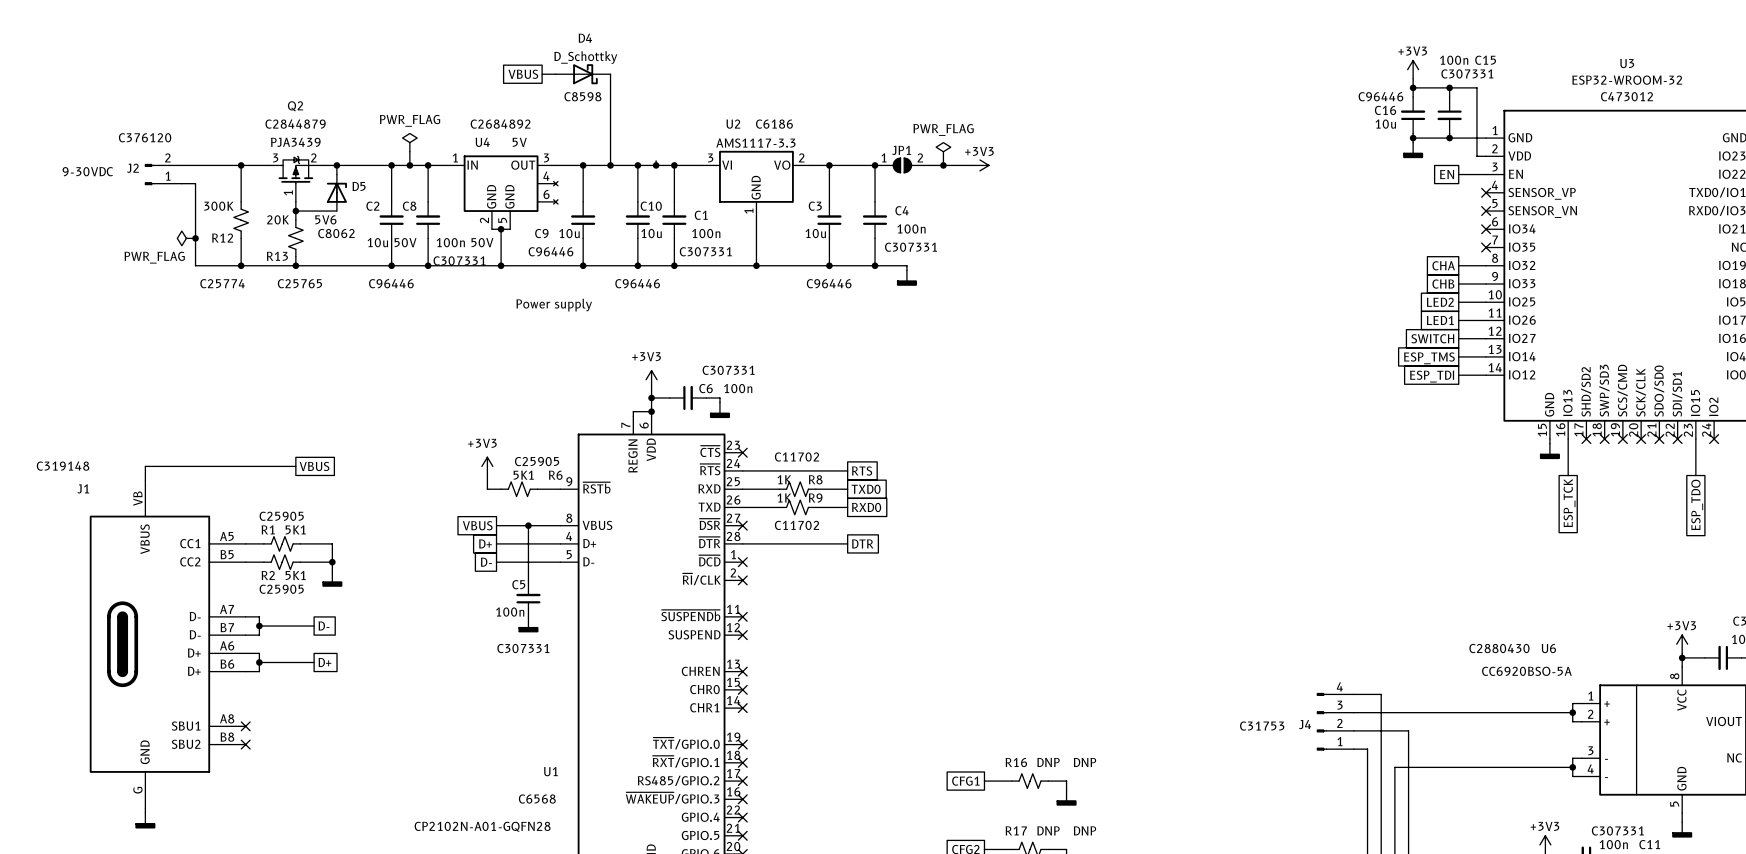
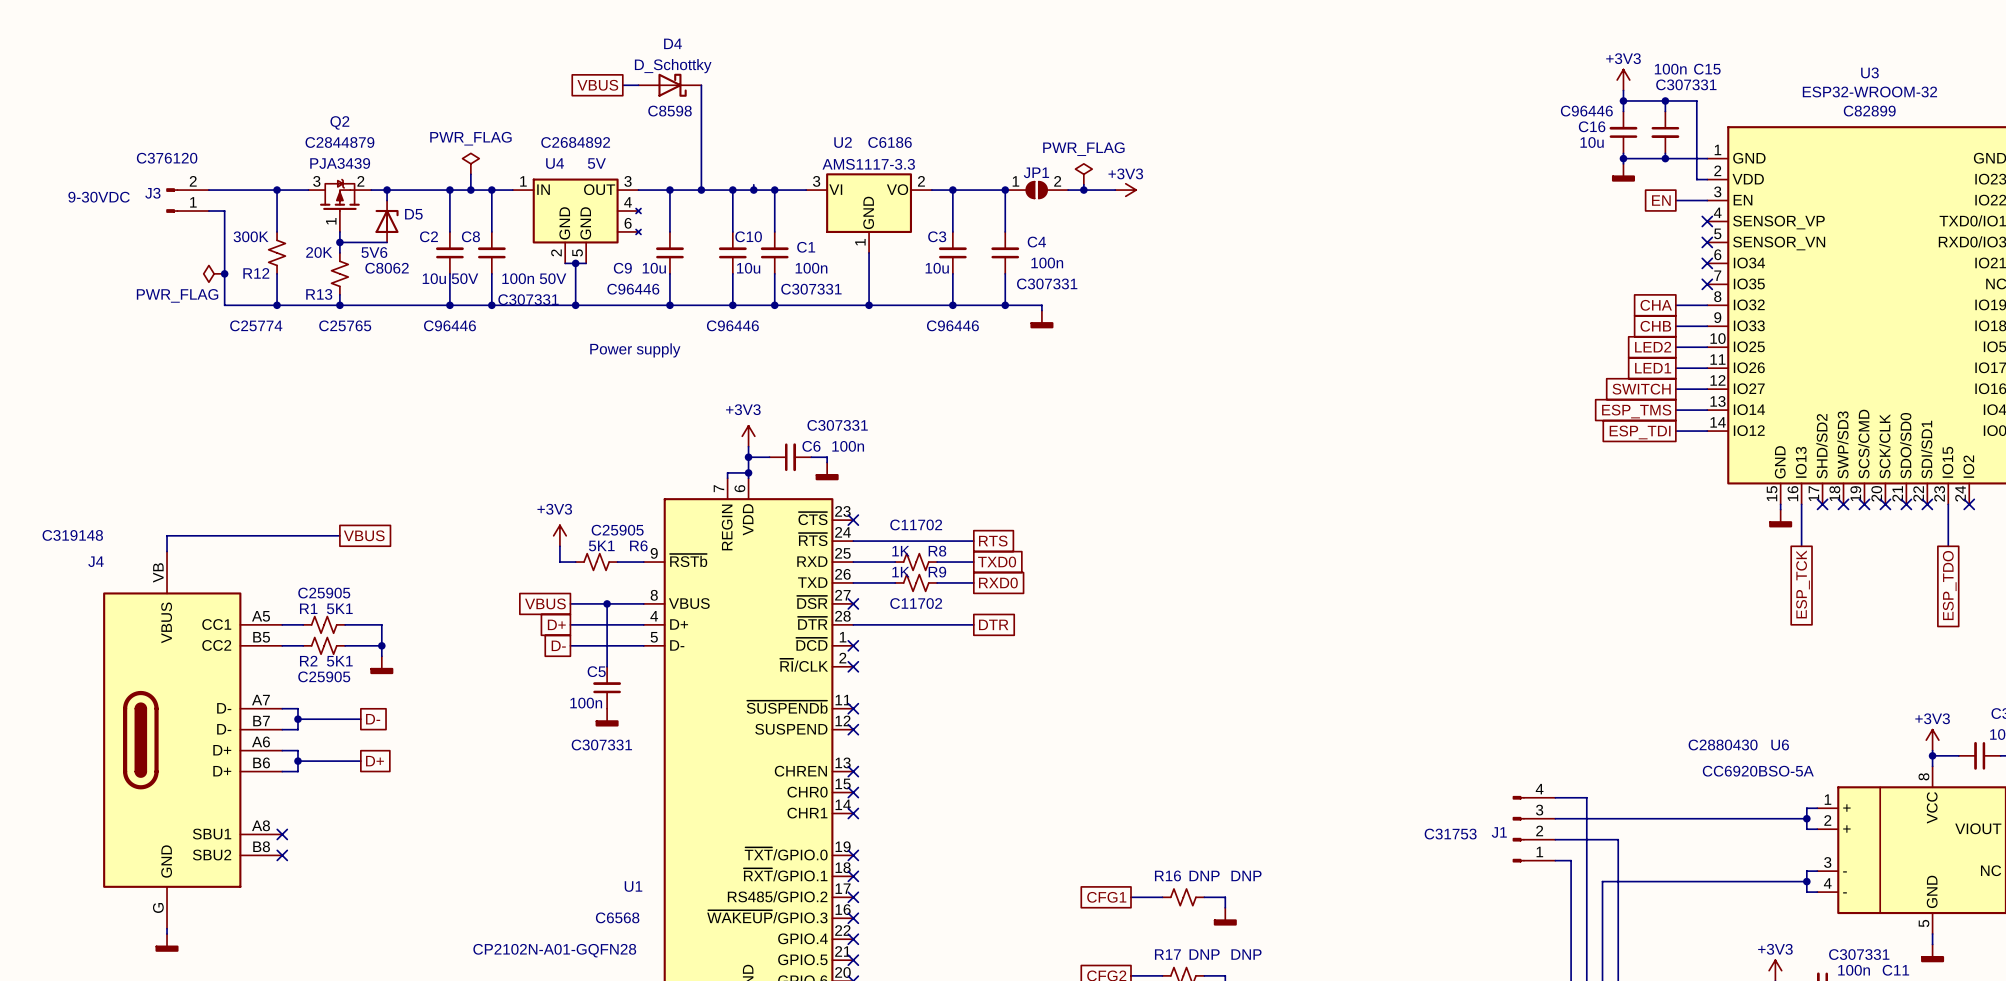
U3 text: C473012 (1627, 96) -> C82899 (1869, 111)
J2 name: J2 (132, 168) -> J3 (152, 193)
J1 name: J1 (83, 488) -> J4 (96, 561)
J4 name: J4 (1305, 724) -> J1 (1499, 832)

